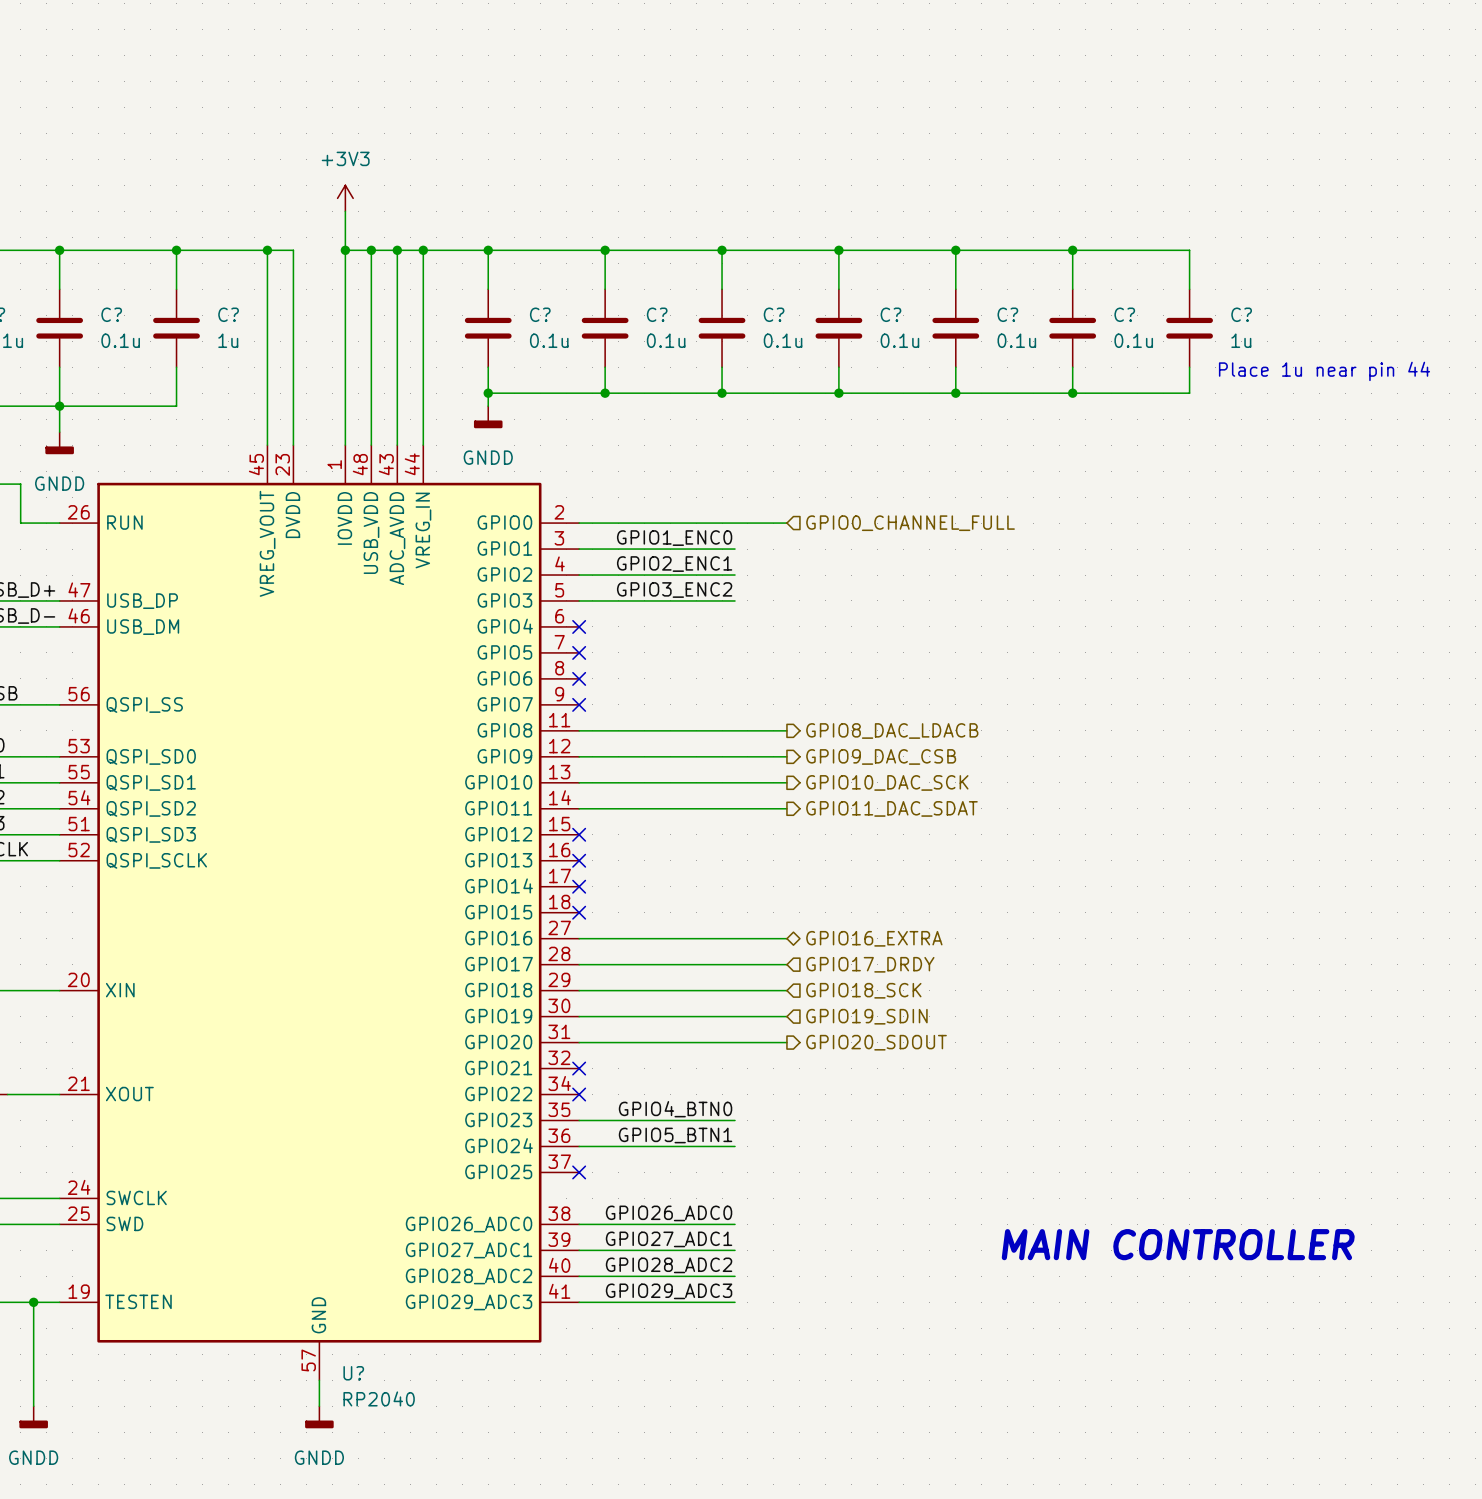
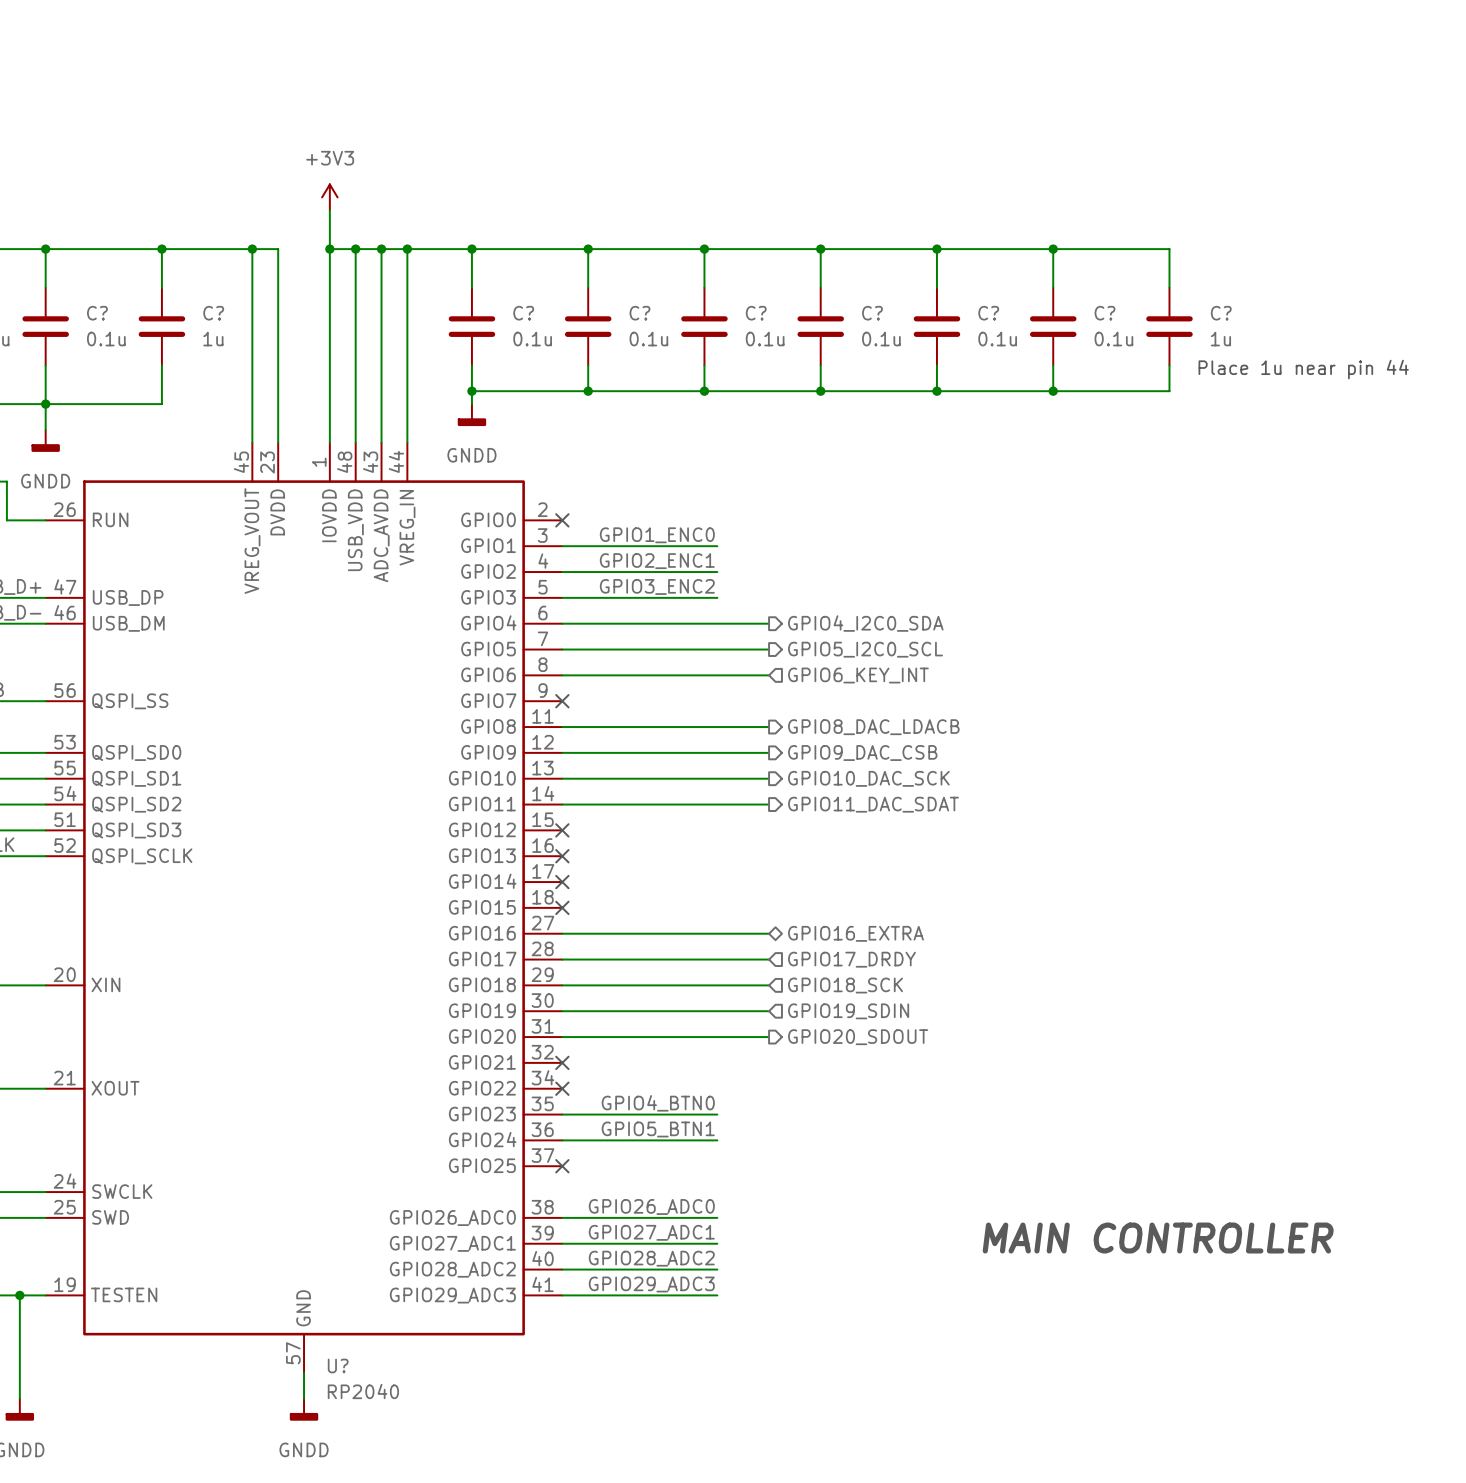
wire: (579, 523) (786, 523) -> (562, 623) (769, 623)
no-connect mark: none -> (562, 520)
hierarchical label: GPIO0_CHANNEL_FULL (910, 523) -> none
no-connect mark: (579, 626) -> none
hierarchical label: none -> GPIO4_I2C0_SDA (865, 623)
wire: none -> (562, 649) (769, 649)
no-connect mark: (579, 652) -> none
hierarchical label: none -> GPIO5_I2C0_SCL (865, 649)
wire: none -> (562, 675) (769, 675)
no-connect mark: (579, 678) -> none
hierarchical label: none -> GPIO6_KEY_INT (858, 675)

